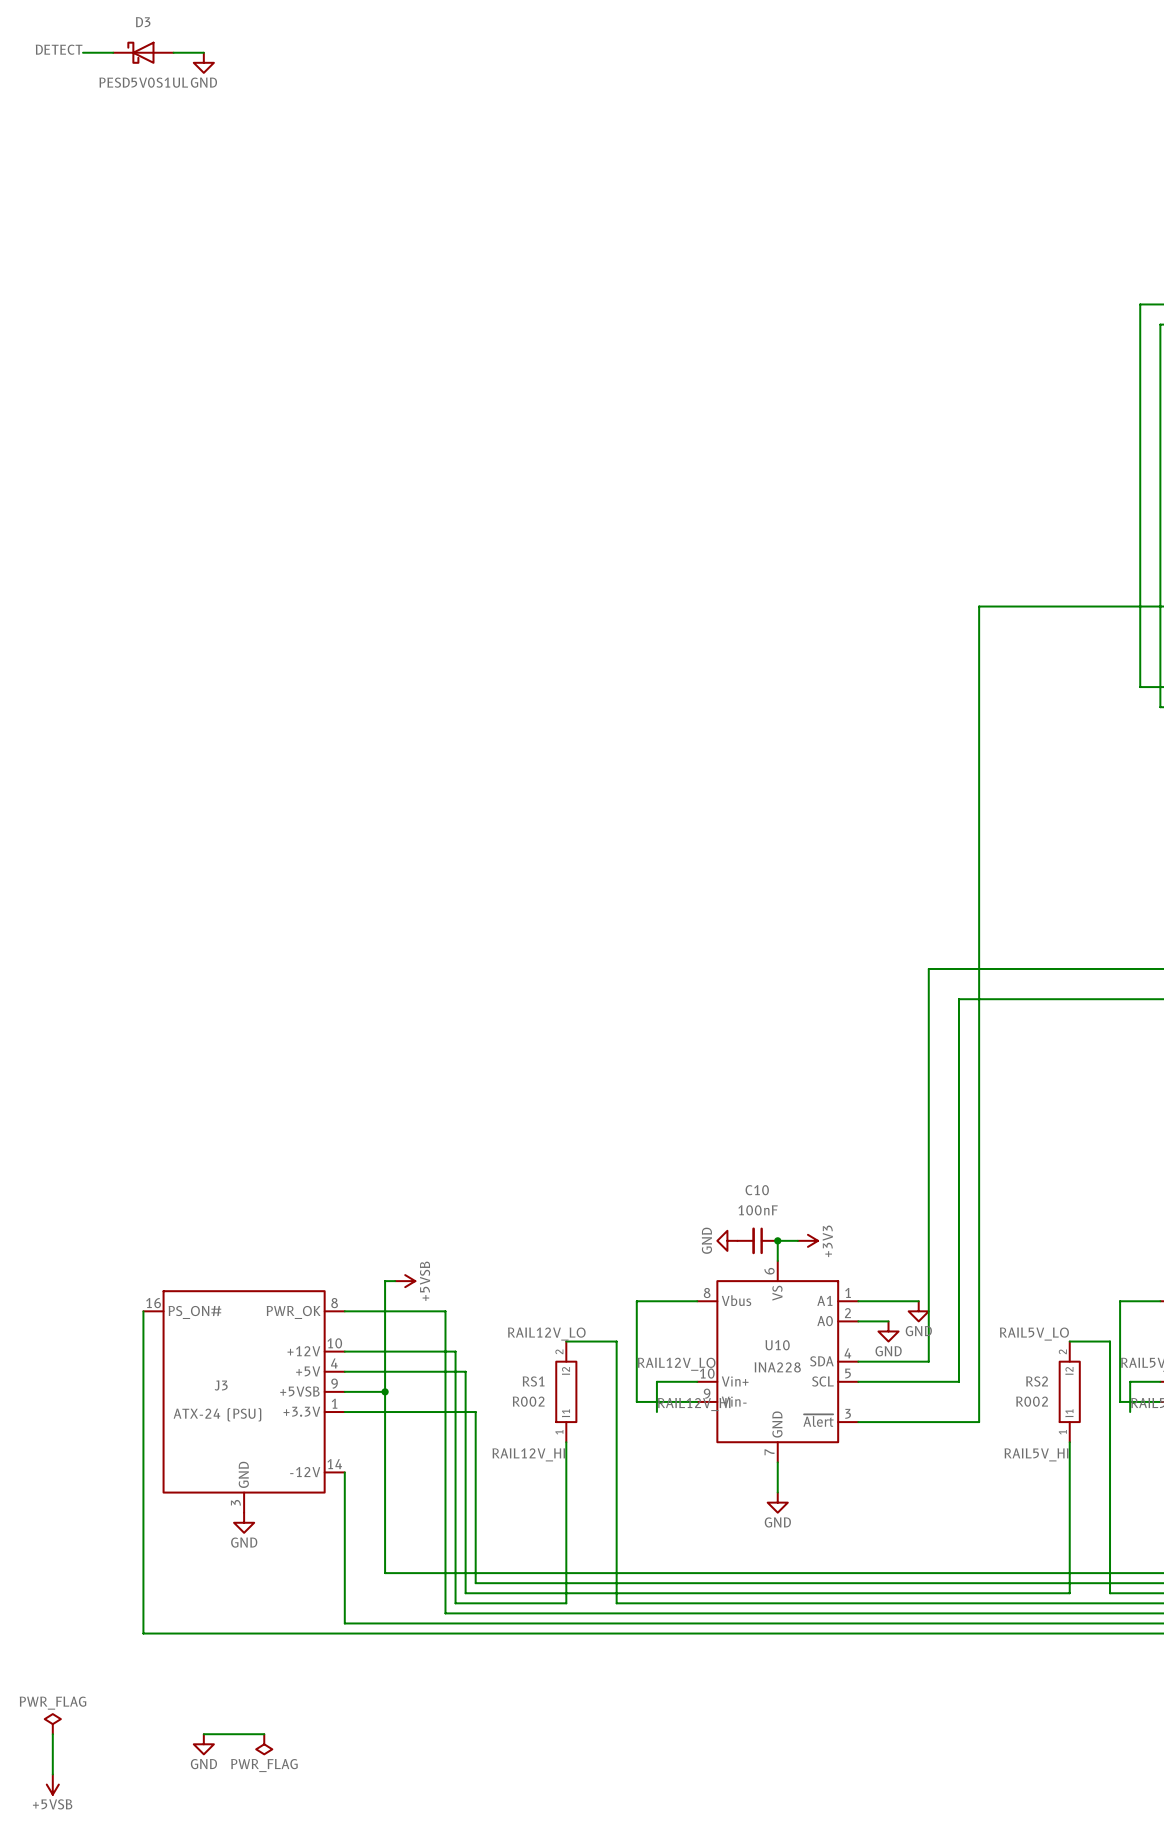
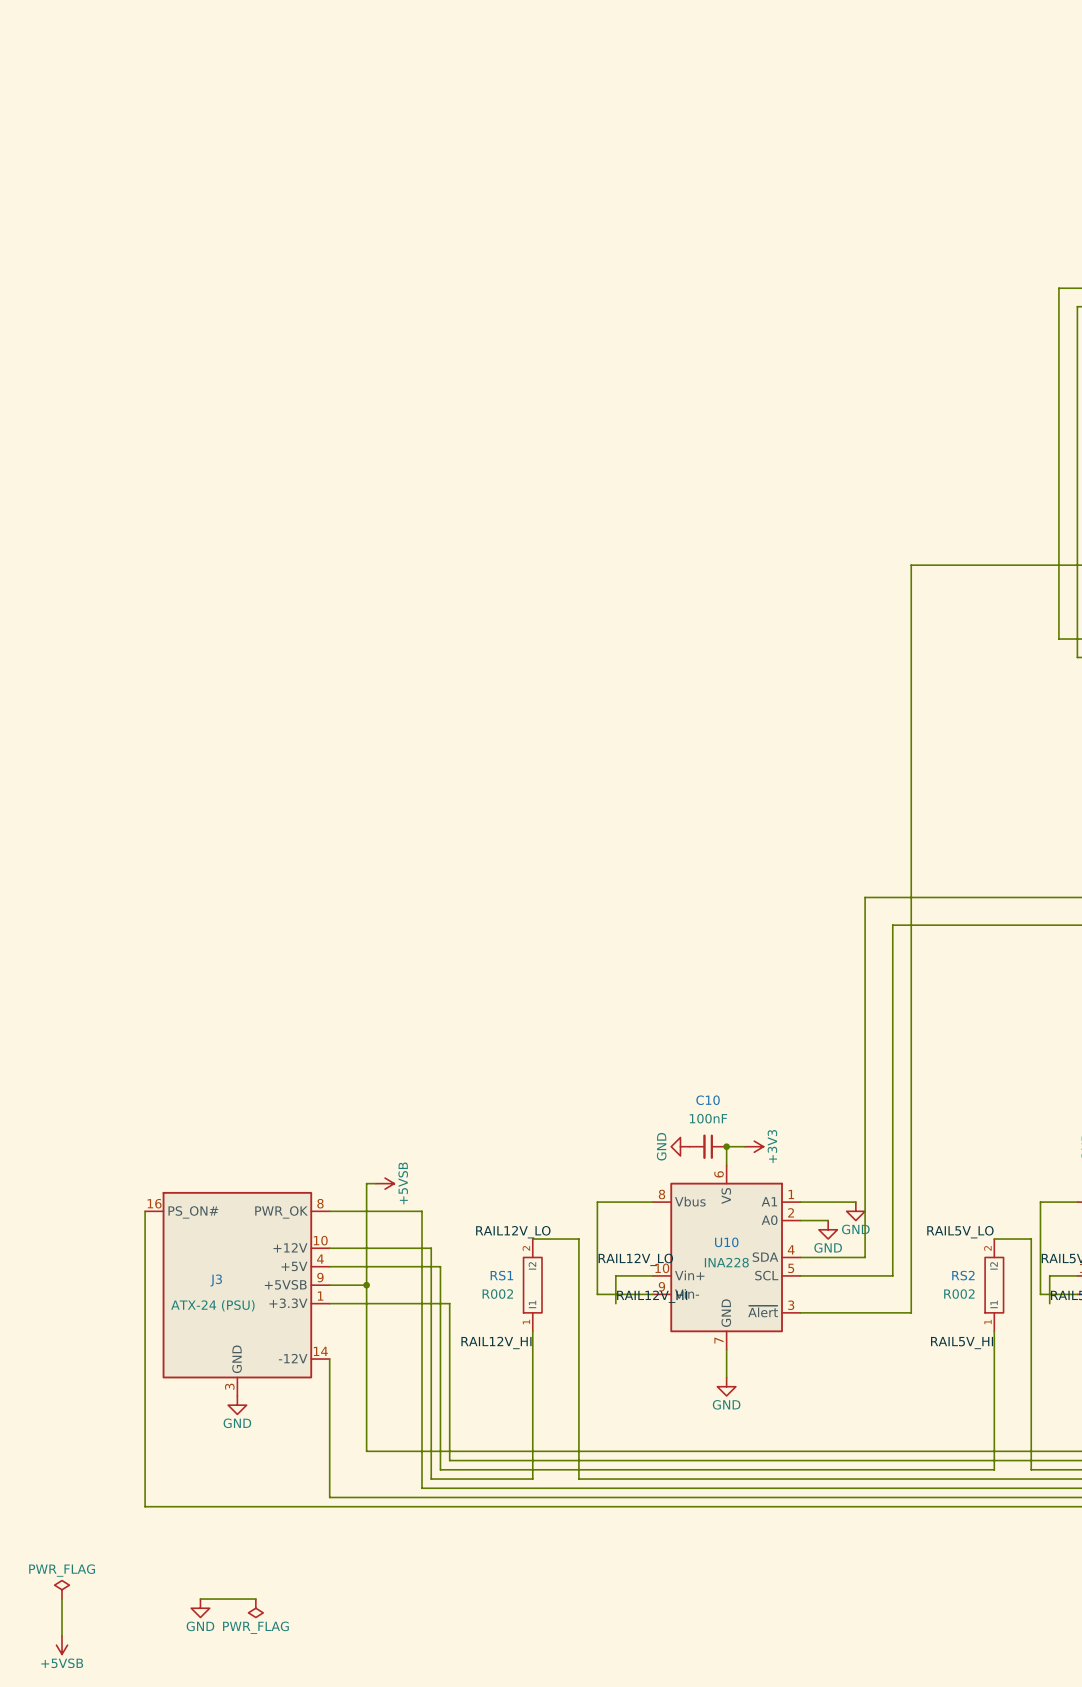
label: DETECT (59, 49) -> none
wire: (83, 52) (113, 52) -> none
D3: PESD5V0S1UL (143, 52) -> none
wire: (173, 52) (203, 52) -> none
power symbol: GND (203, 62) -> none

